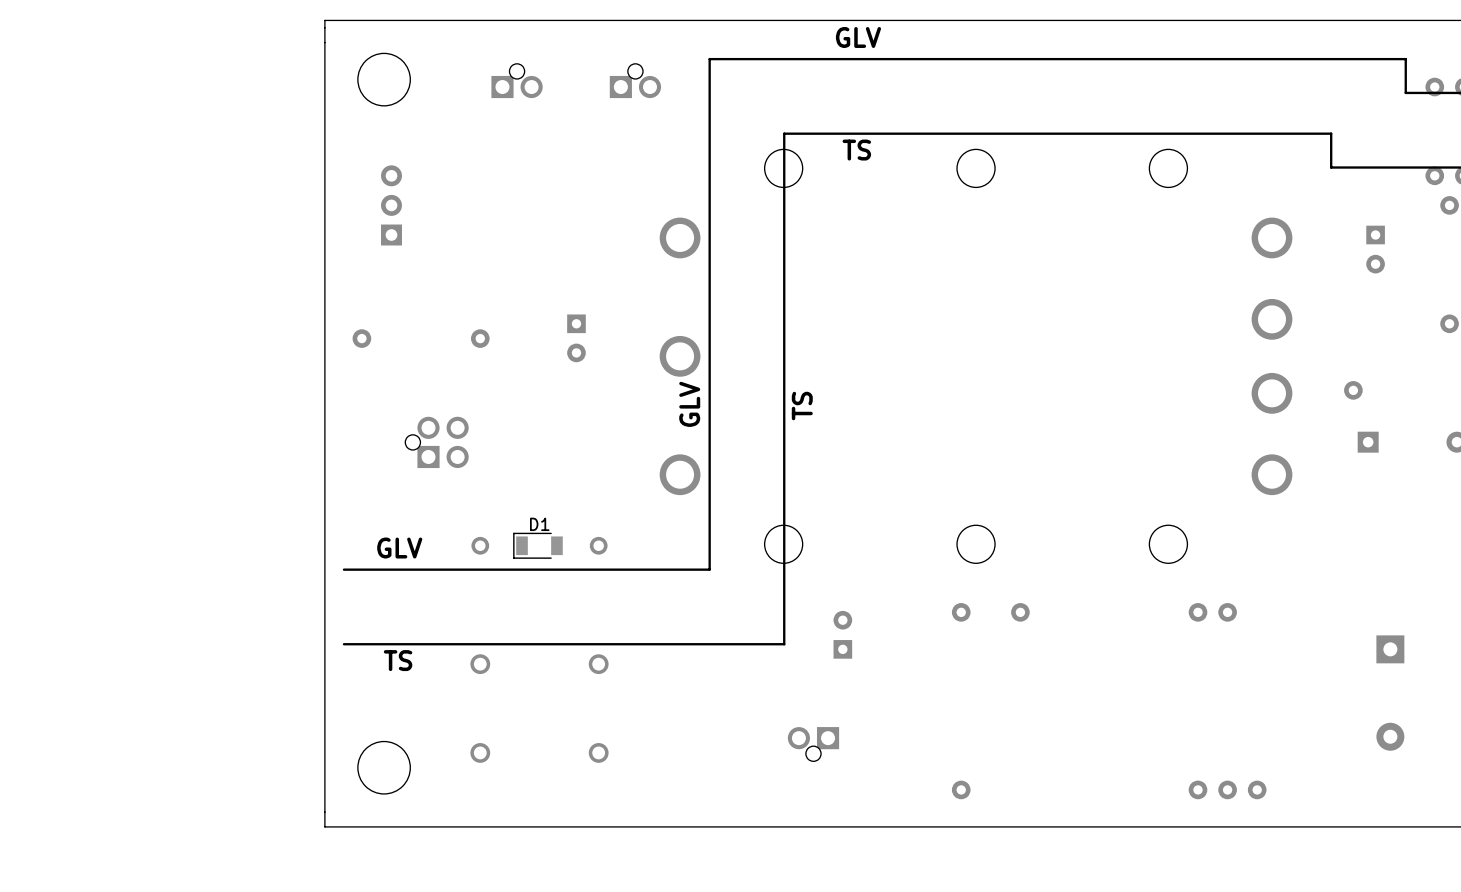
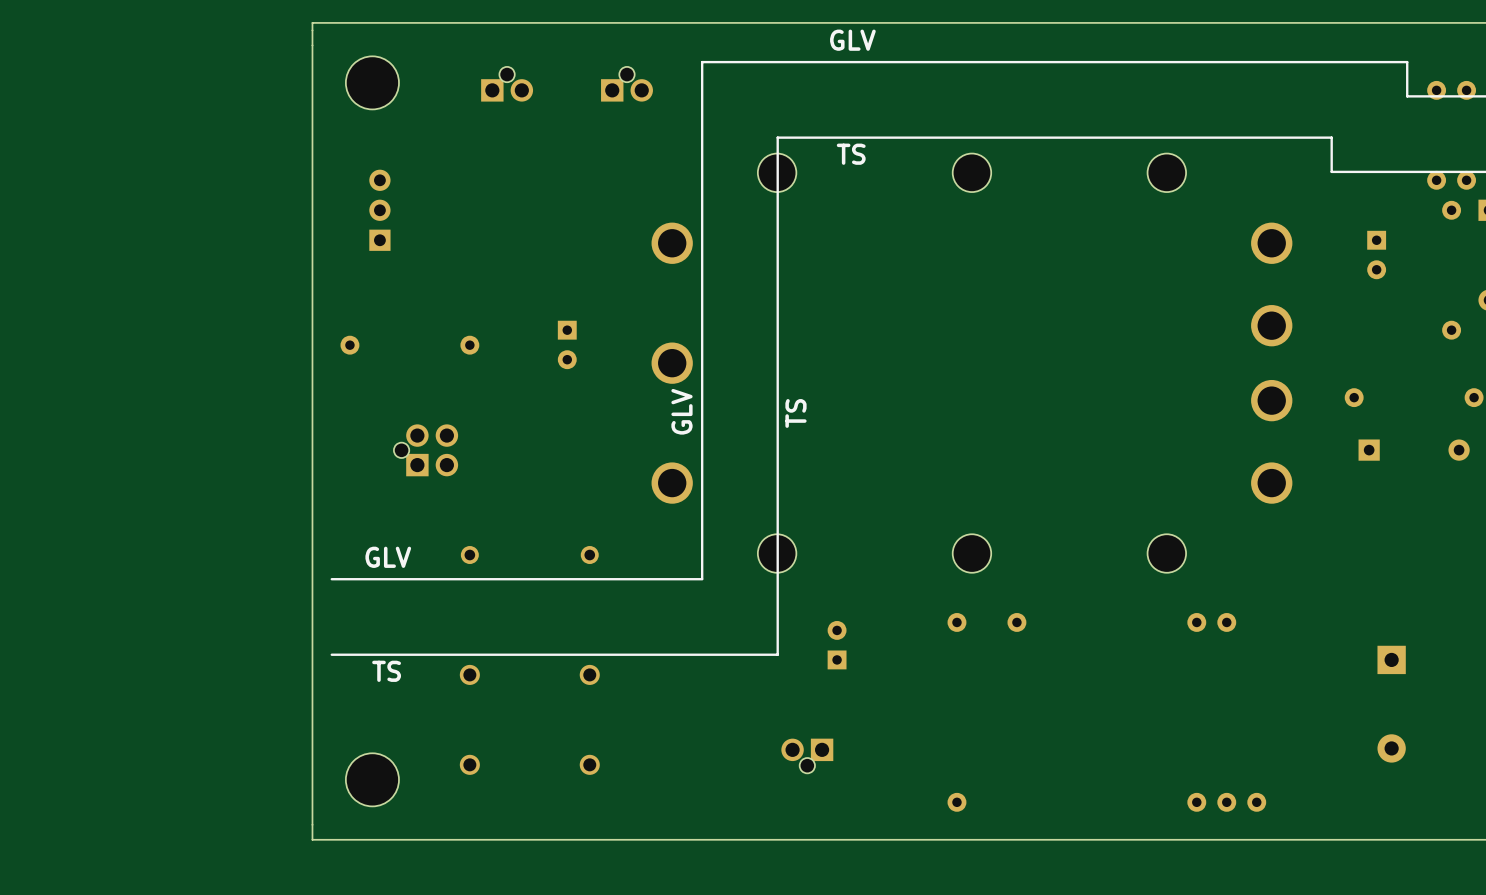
D1: (537, 545) -> none

